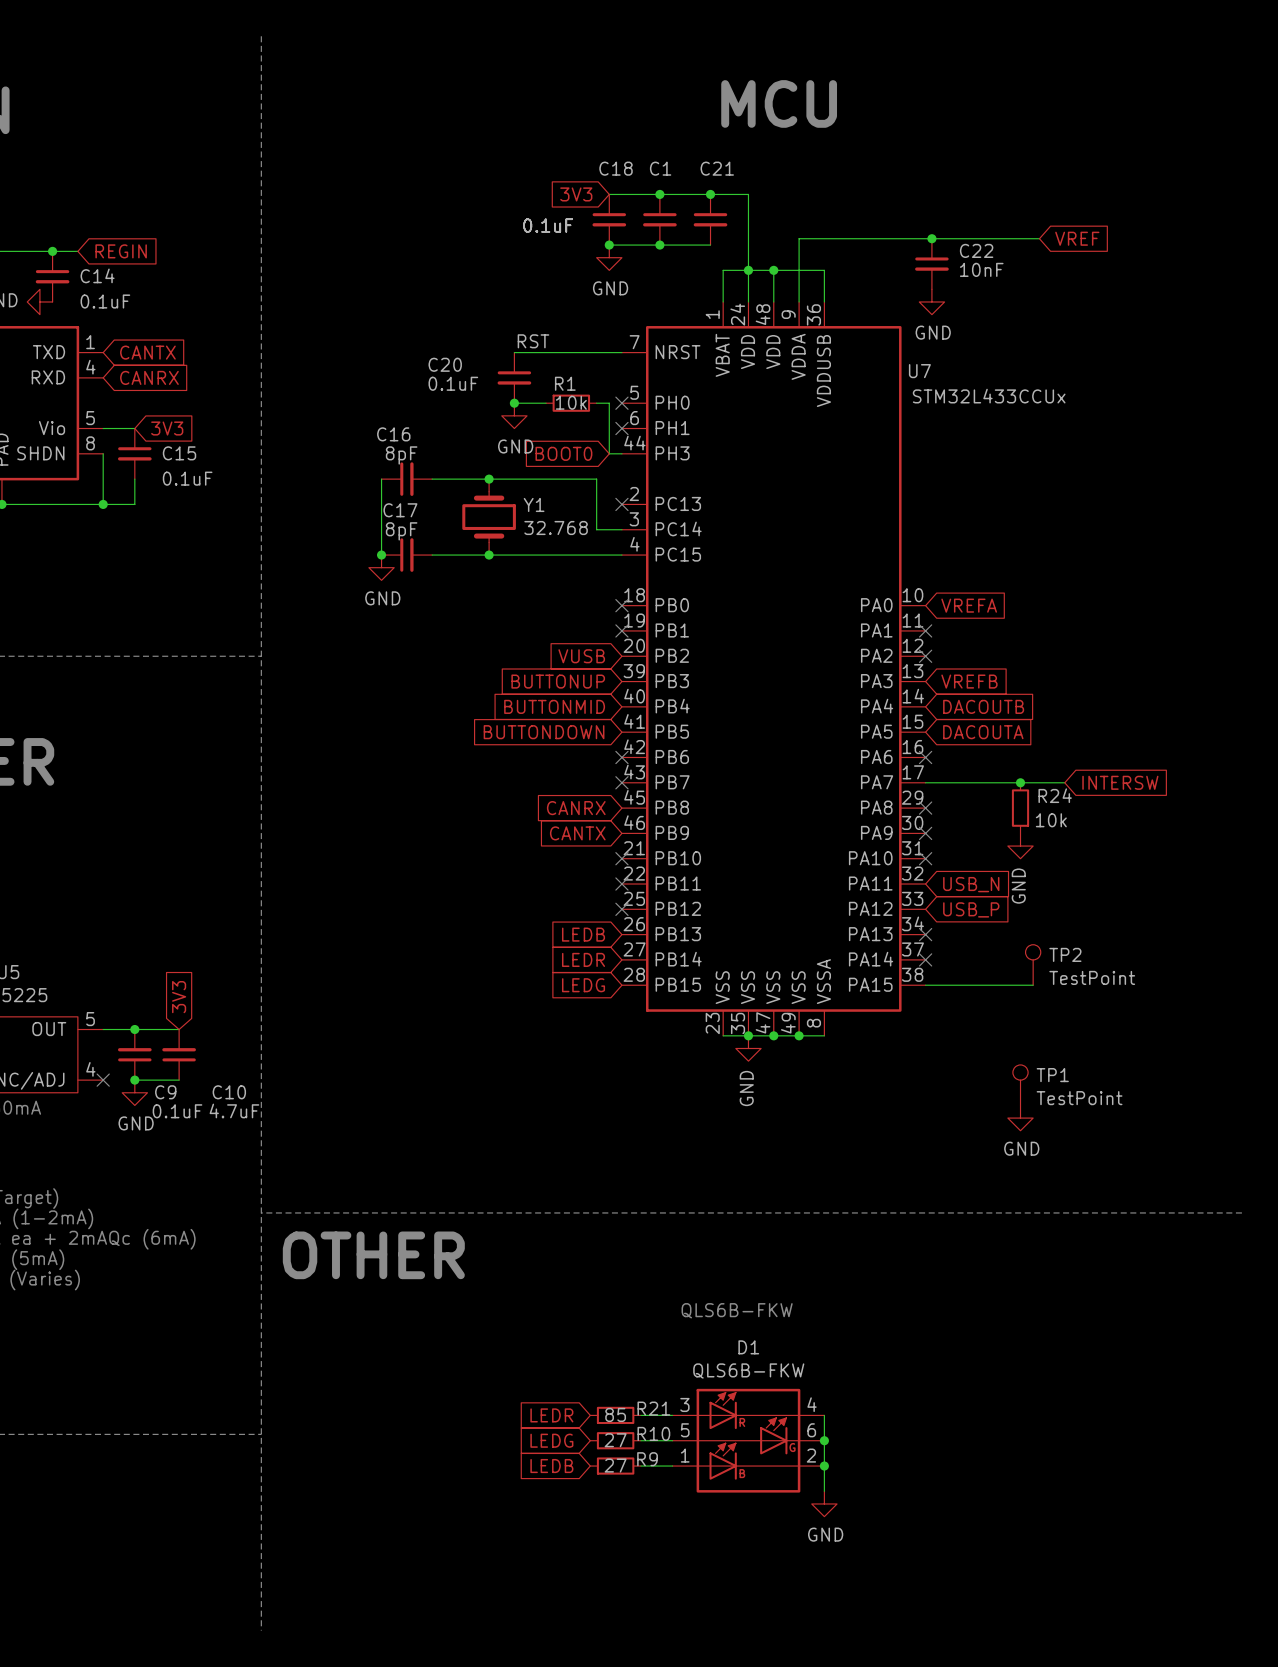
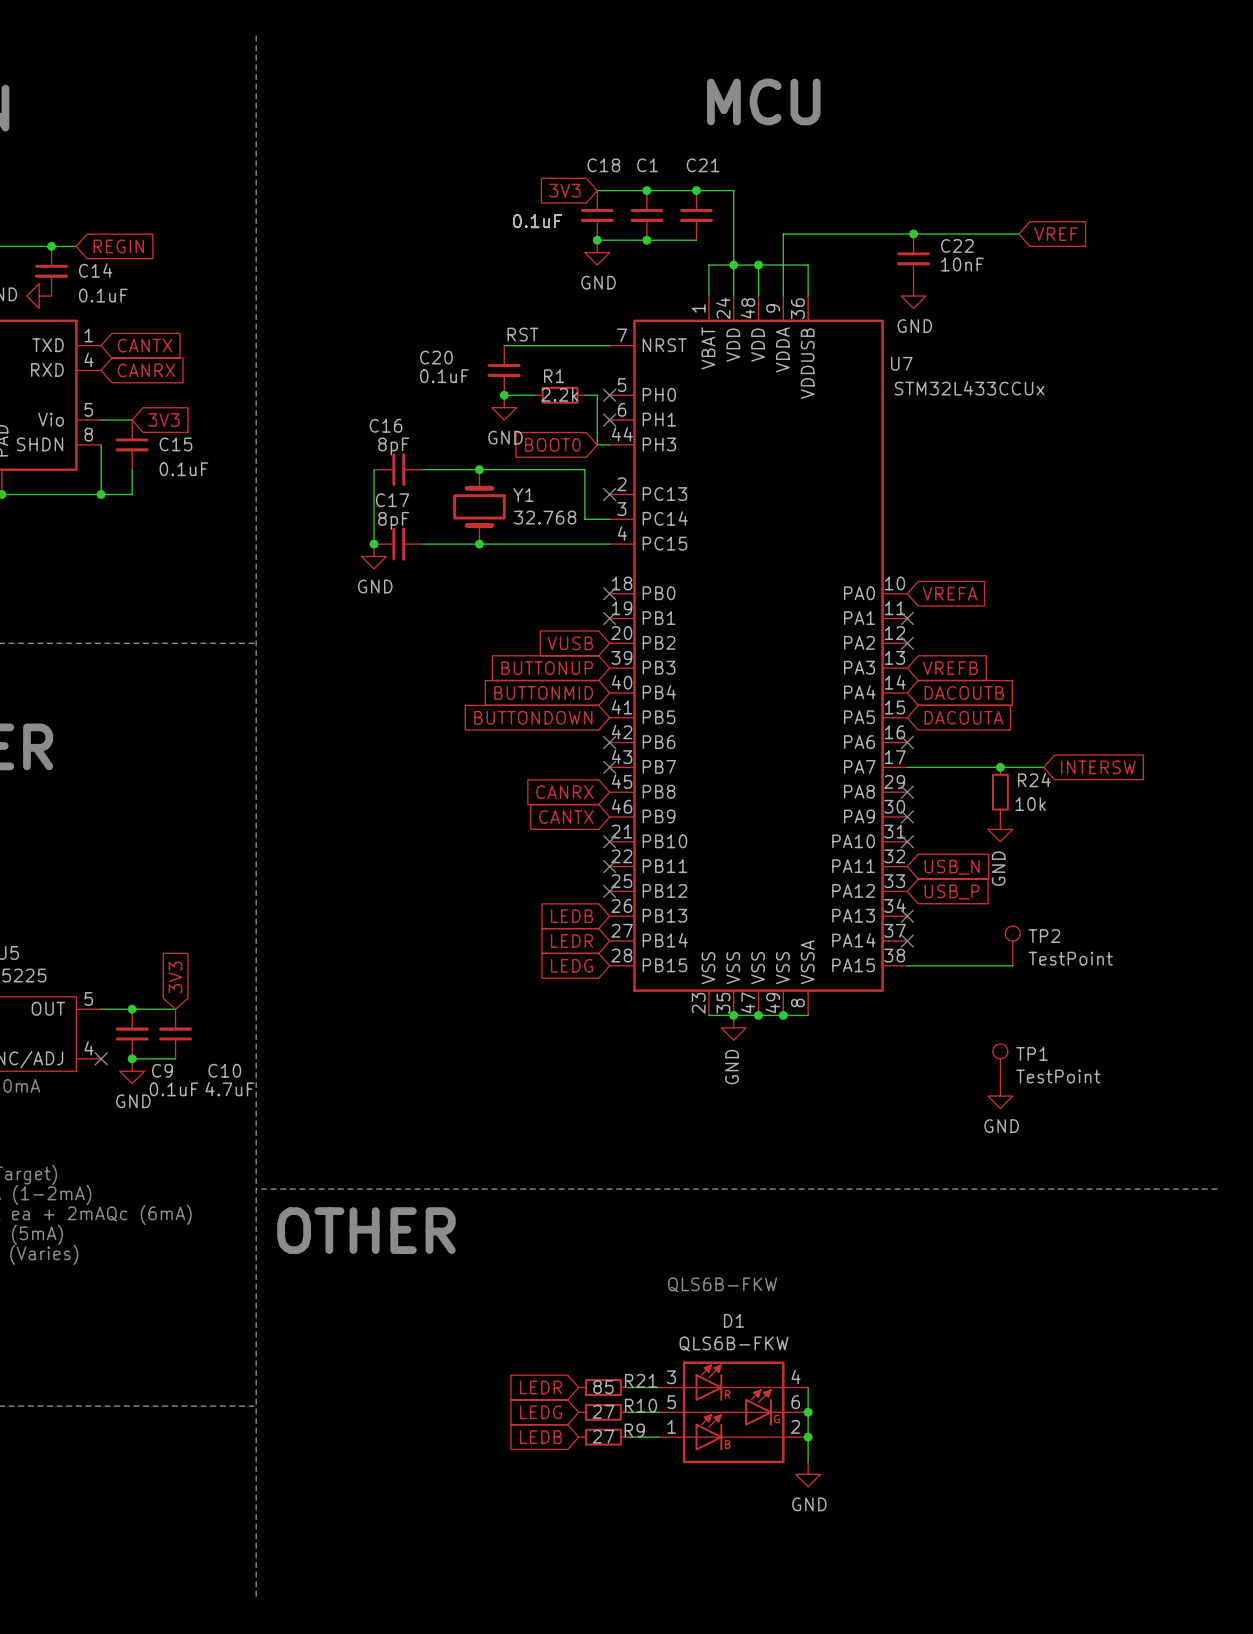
R1 value: 10k (571, 402) -> 2.2k (559, 394)

